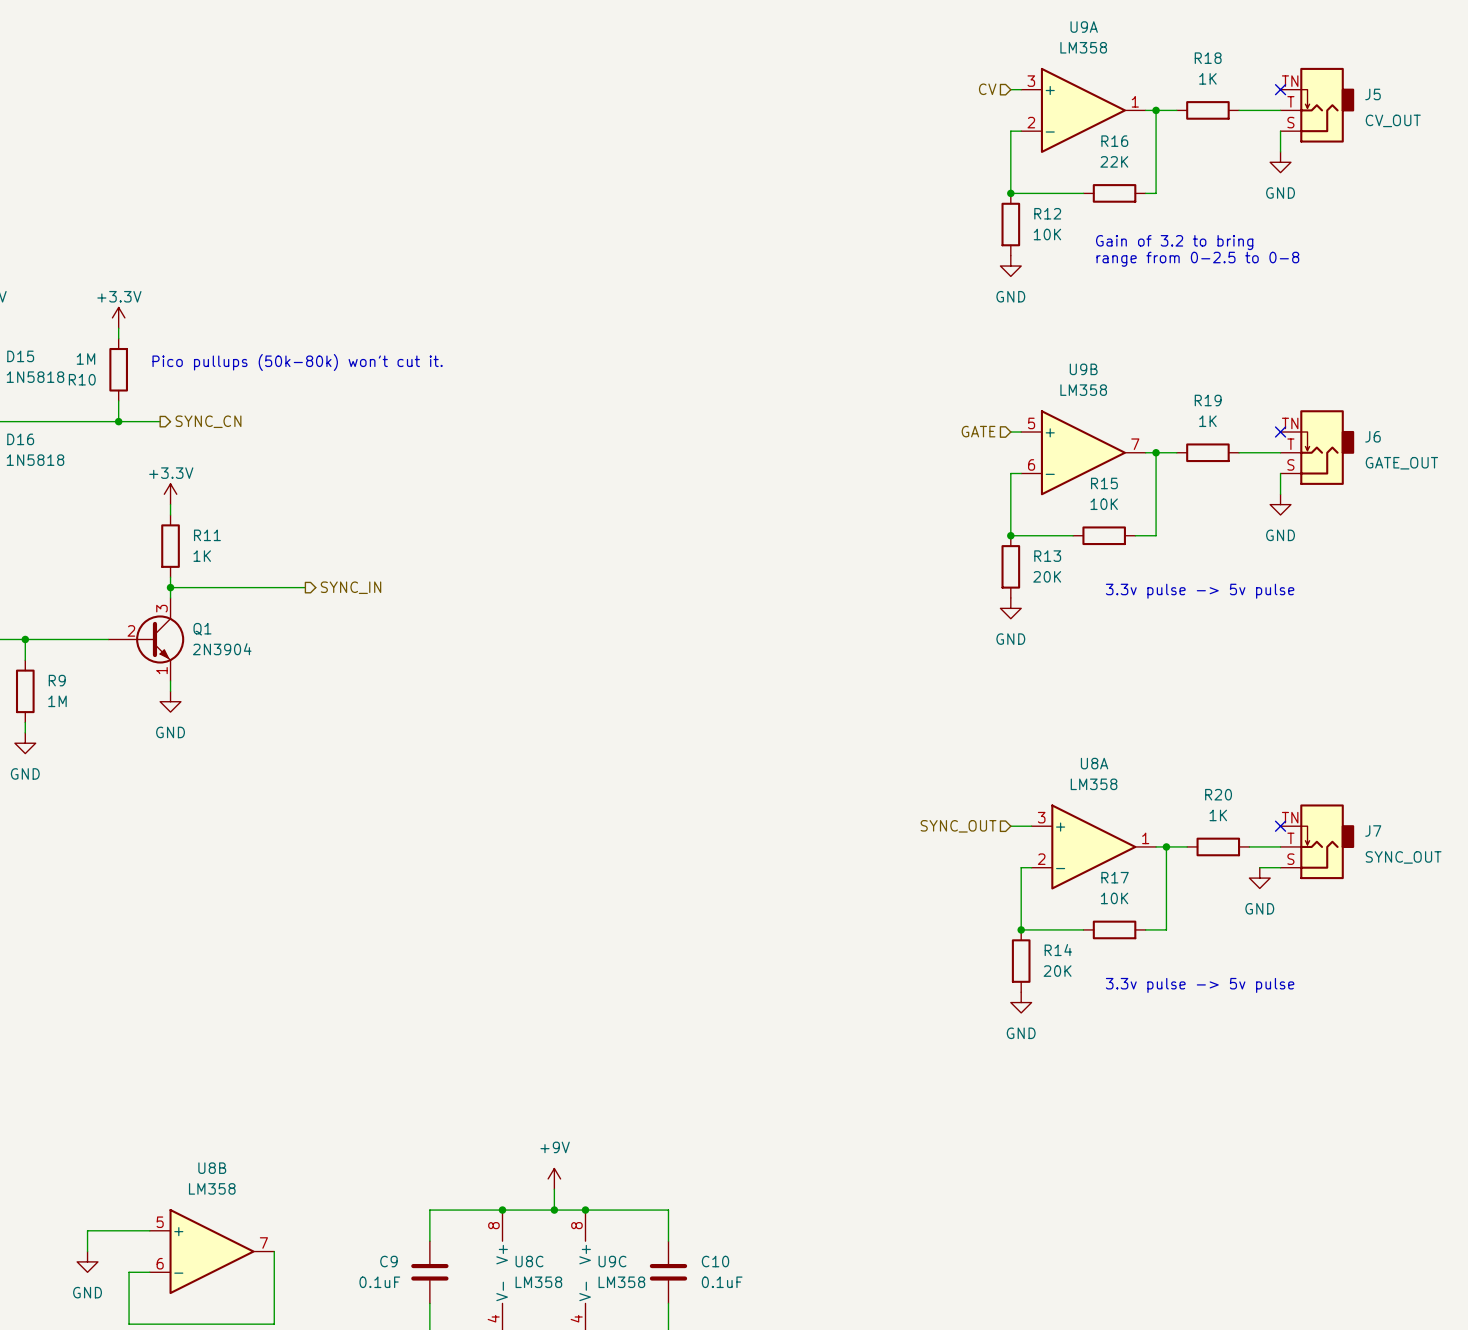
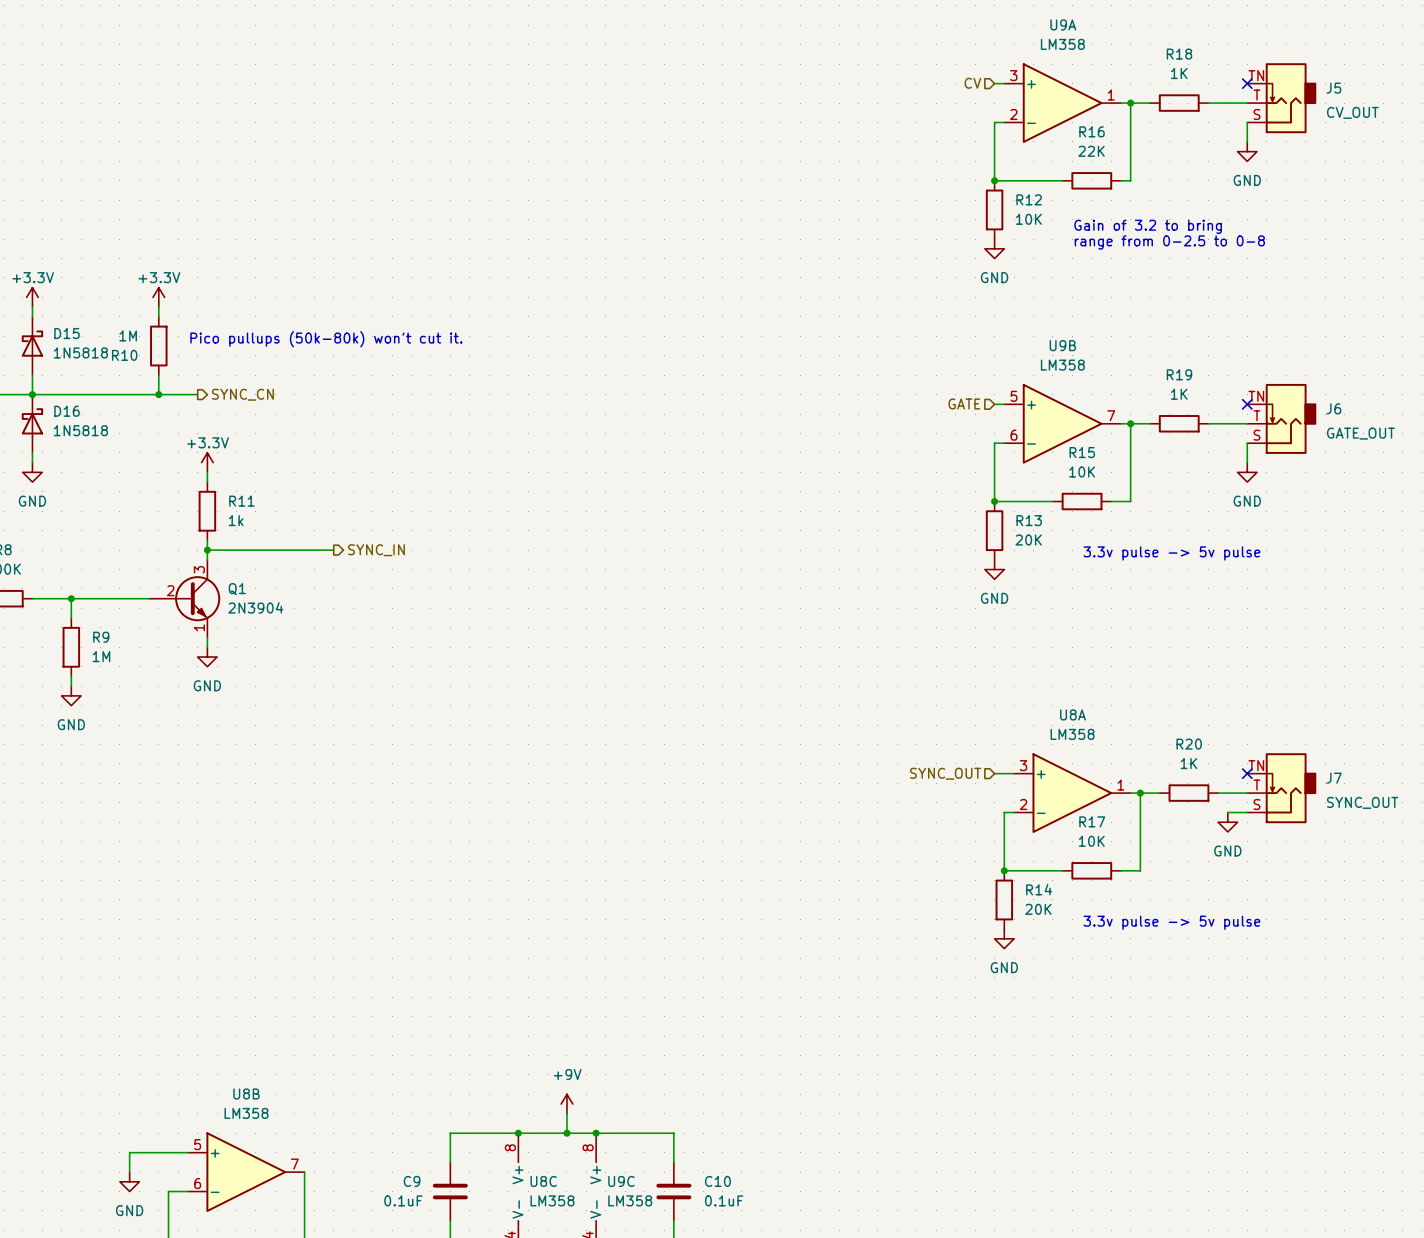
R11 value: 1K (202, 556) -> 1k (236, 520)

